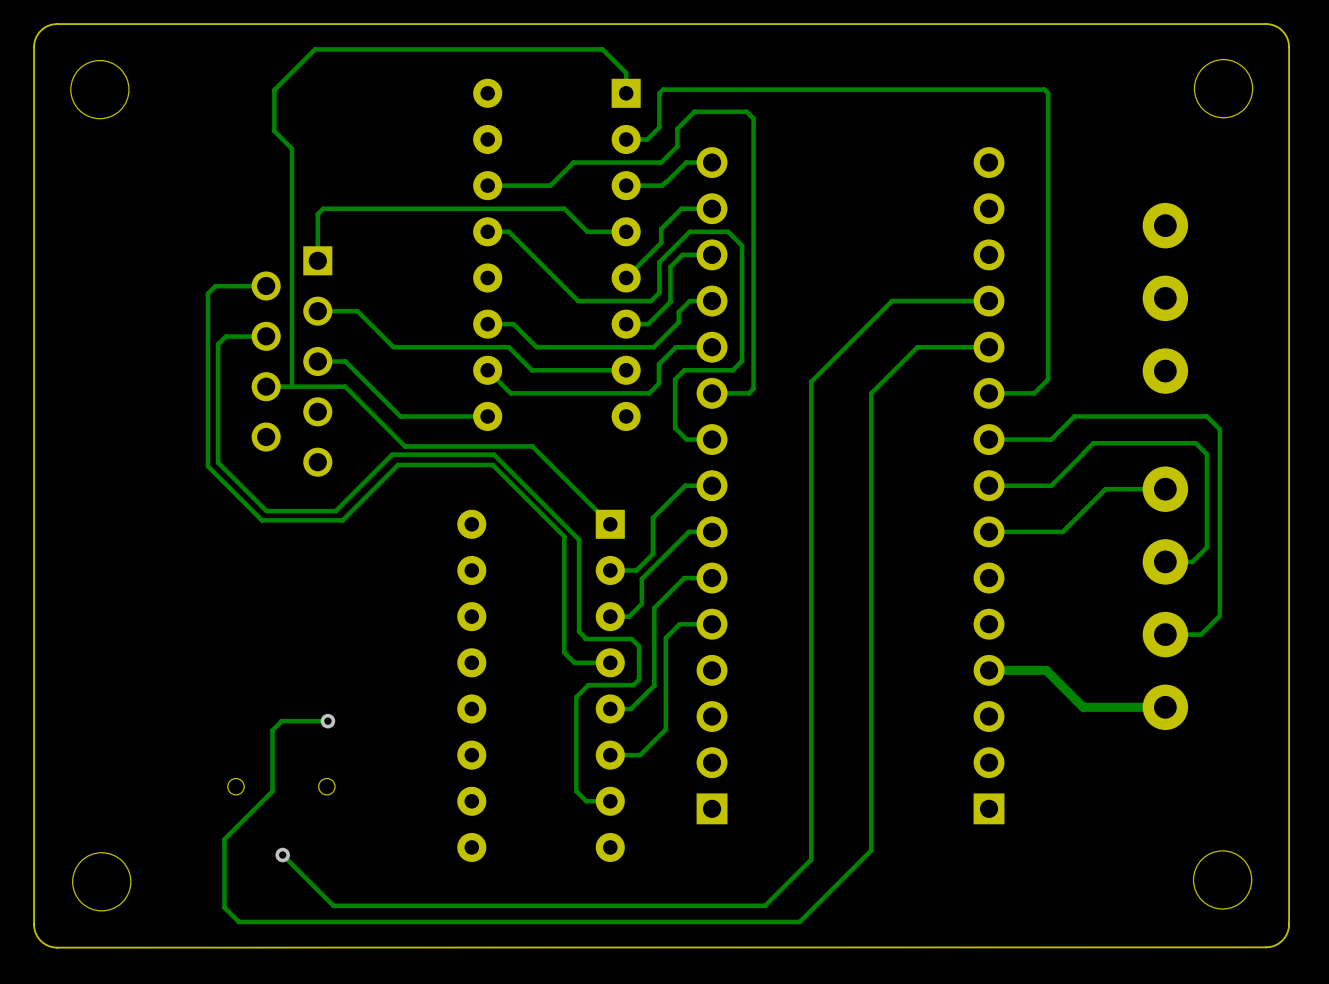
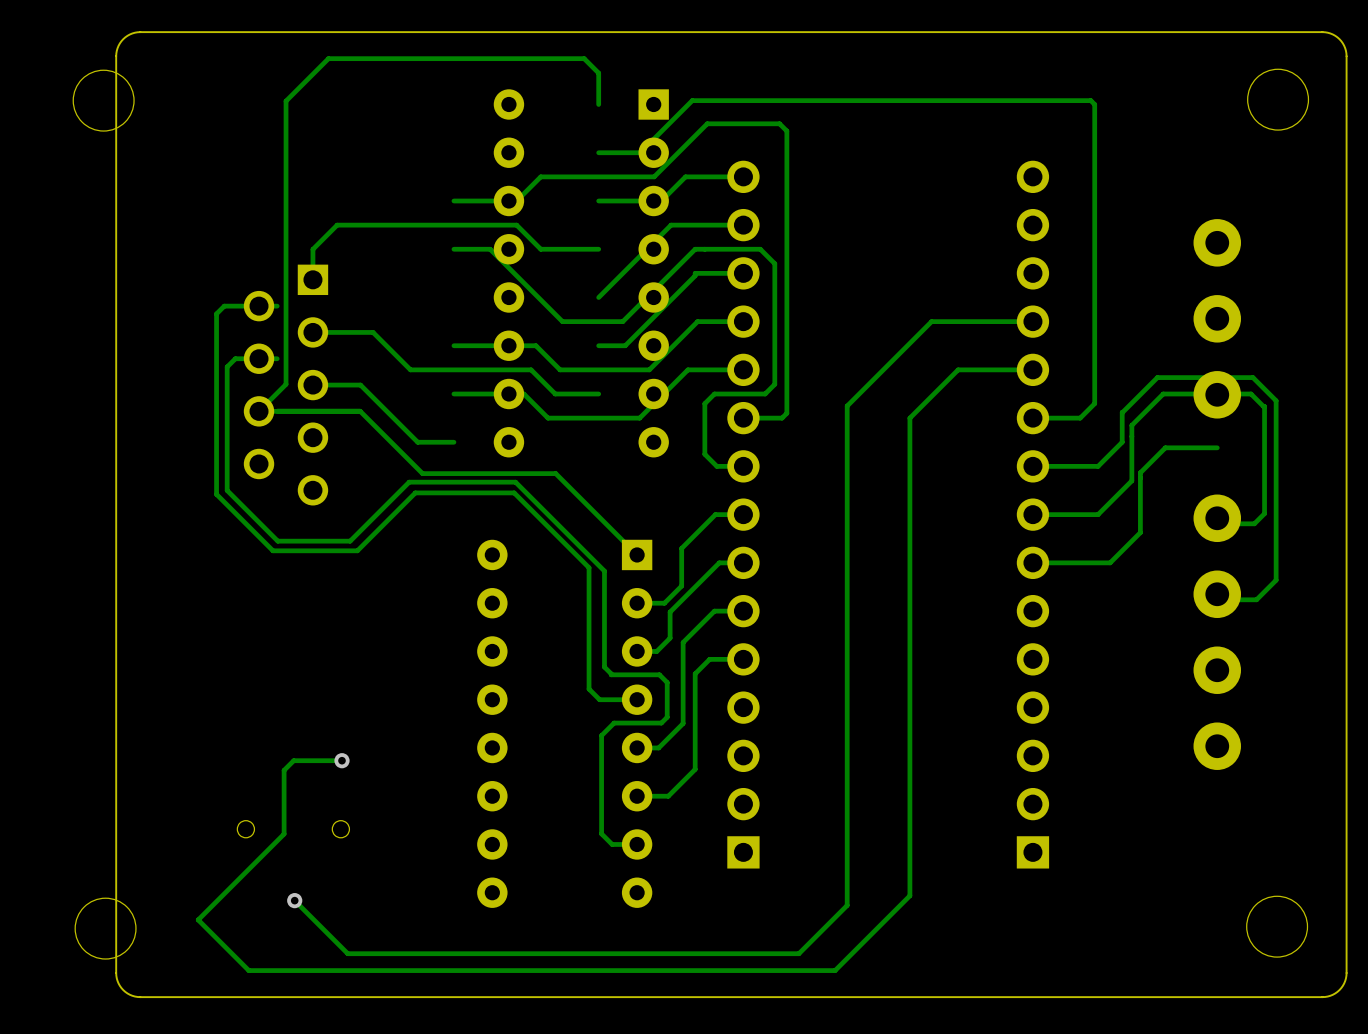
board edge: (134, 24) (51, 24) (40, 30) (34, 44) (34, 924) (35, 933) (43, 942) (57, 947) (1266, 947) -> (140, 32) (129, 34) (123, 39) (117, 48) (116, 56) (116, 973) (118, 983) (125, 991) (140, 997) (1322, 997)
track: (559, 49) (602, 49) (626, 72) (626, 93) -> (584, 58) (598, 73) (598, 104)
track: (659, 93) (659, 127) (647, 139) (626, 139) -> (688, 104) (640, 152) (598, 152)
track: (694, 111) (677, 128) (677, 146) (661, 162) -> (725, 123) (707, 123) (654, 176)
track: (274, 131) (291, 148) (291, 386) -> (286, 144) (286, 384) (259, 411) (360, 411)
track: (573, 162) (550, 185) (495, 185) -> (598, 176) (540, 176) (516, 200)
track: (656, 162) (626, 162) -> (685, 176) (661, 200)
track: (686, 162) (662, 185) (633, 185) -> (716, 176) (690, 176)
track: none -> (508, 200) (453, 200)
track: (495, 208) (564, 208) (587, 231) (626, 231) -> (516, 225) (540, 249) (598, 249)
track: (681, 208) (661, 229) (661, 242) (626, 277) -> (711, 225) (671, 225) (598, 297)
track: (317, 214) (317, 260) -> (331, 230) (312, 249) (312, 279)
track: (487, 231) (508, 231) (578, 301) -> (453, 249) (490, 249) (562, 321) (603, 321)
track: (689, 231) (659, 262) (659, 292) (651, 301) (596, 301) -> (720, 249) (695, 249) (622, 321)
track: (682, 254) (670, 266) (670, 301) (648, 324) (626, 324) -> (712, 273) (695, 273) (695, 275) (625, 345) (598, 345)
track: (689, 301) (678, 312) (678, 322) (653, 347) (622, 347) -> (720, 321) (697, 321) (649, 369)
track: (357, 311) (317, 311) -> (373, 332) (312, 332)
track: (676, 347) (658, 364) (658, 383) (649, 393) (612, 393) -> (705, 369) (687, 369) (639, 418)
part position: (291, 361) -> (285, 385)
track: (345, 361) (317, 361) -> (360, 385) (312, 385)
track: (487, 370) (510, 393) (525, 393) -> (453, 394) (523, 394) (548, 418)
track: (626, 370) (573, 370) -> (653, 200) (598, 200)
track: (487, 416) (435, 416) -> (508, 345) (453, 345)
track: (1074, 416) (1206, 416) (1219, 429) (1219, 615) (1201, 634) (1165, 634) -> (1122, 442) (1122, 412) (1157, 377) (1252, 377) (1276, 400) (1276, 580) (1256, 599) (1217, 599)
track: (1083, 452) (1093, 443) (1195, 443) (1206, 454) (1206, 547) (1192, 561) (1165, 561) -> (1131, 480) (1131, 425) (1163, 394) (1251, 394) (1264, 406) (1264, 513) (1254, 523) (1217, 523)
track: (1165, 489) (1105, 489) (1091, 502) -> (1217, 447) (1165, 447) (1140, 472) (1140, 532)
track: (989, 670) (1046, 670) (1083, 707) (1165, 707) -> none
track: (224, 839) (224, 907) -> (233, 884) (198, 919) (233, 955)

